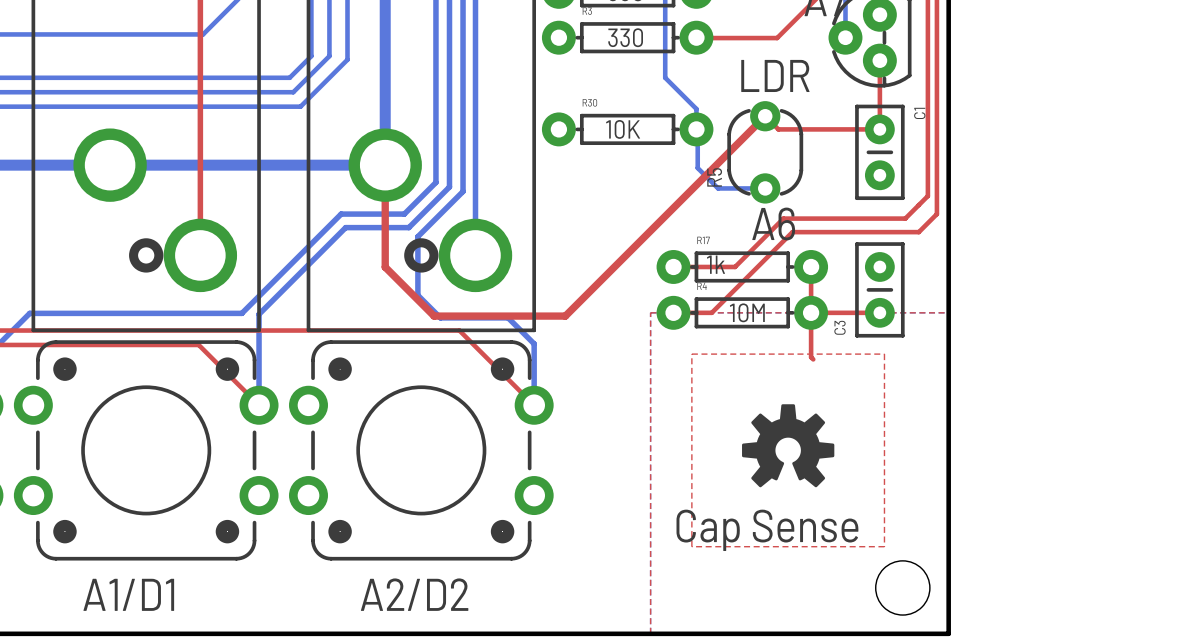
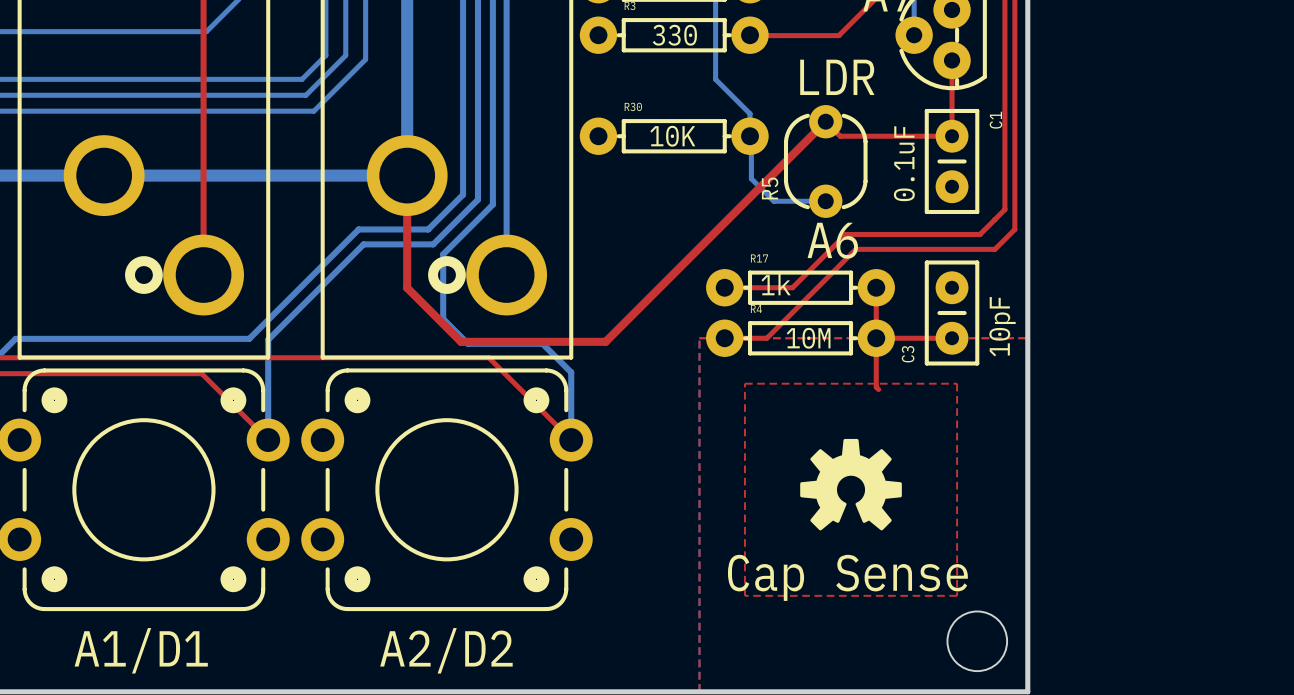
text: none -> 0.1uF (904, 163)
text: none -> 10pF (1002, 326)

